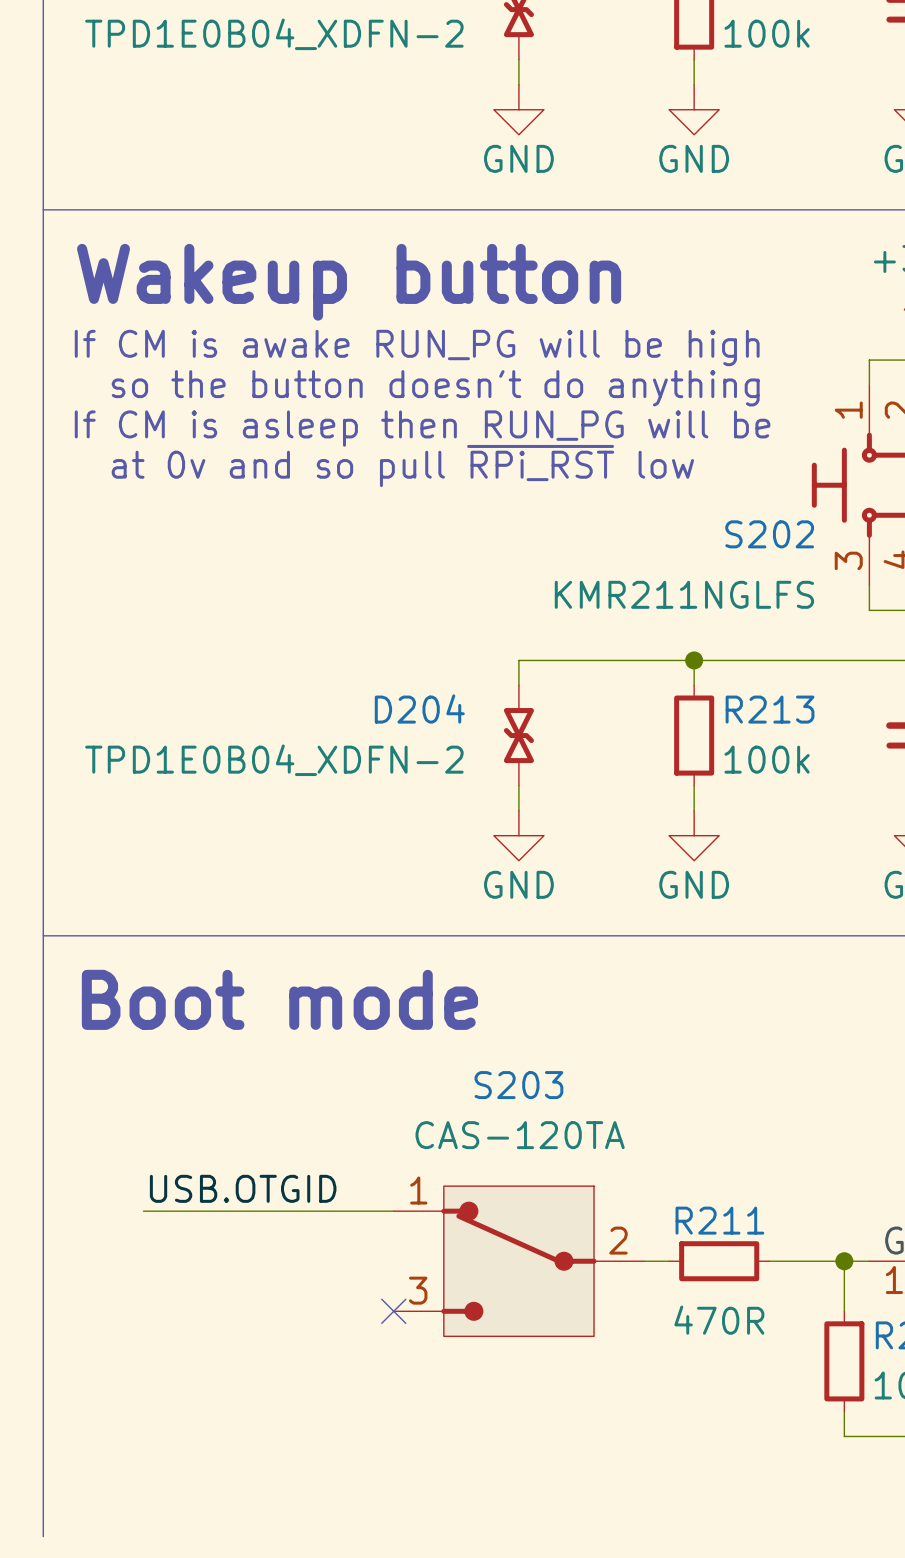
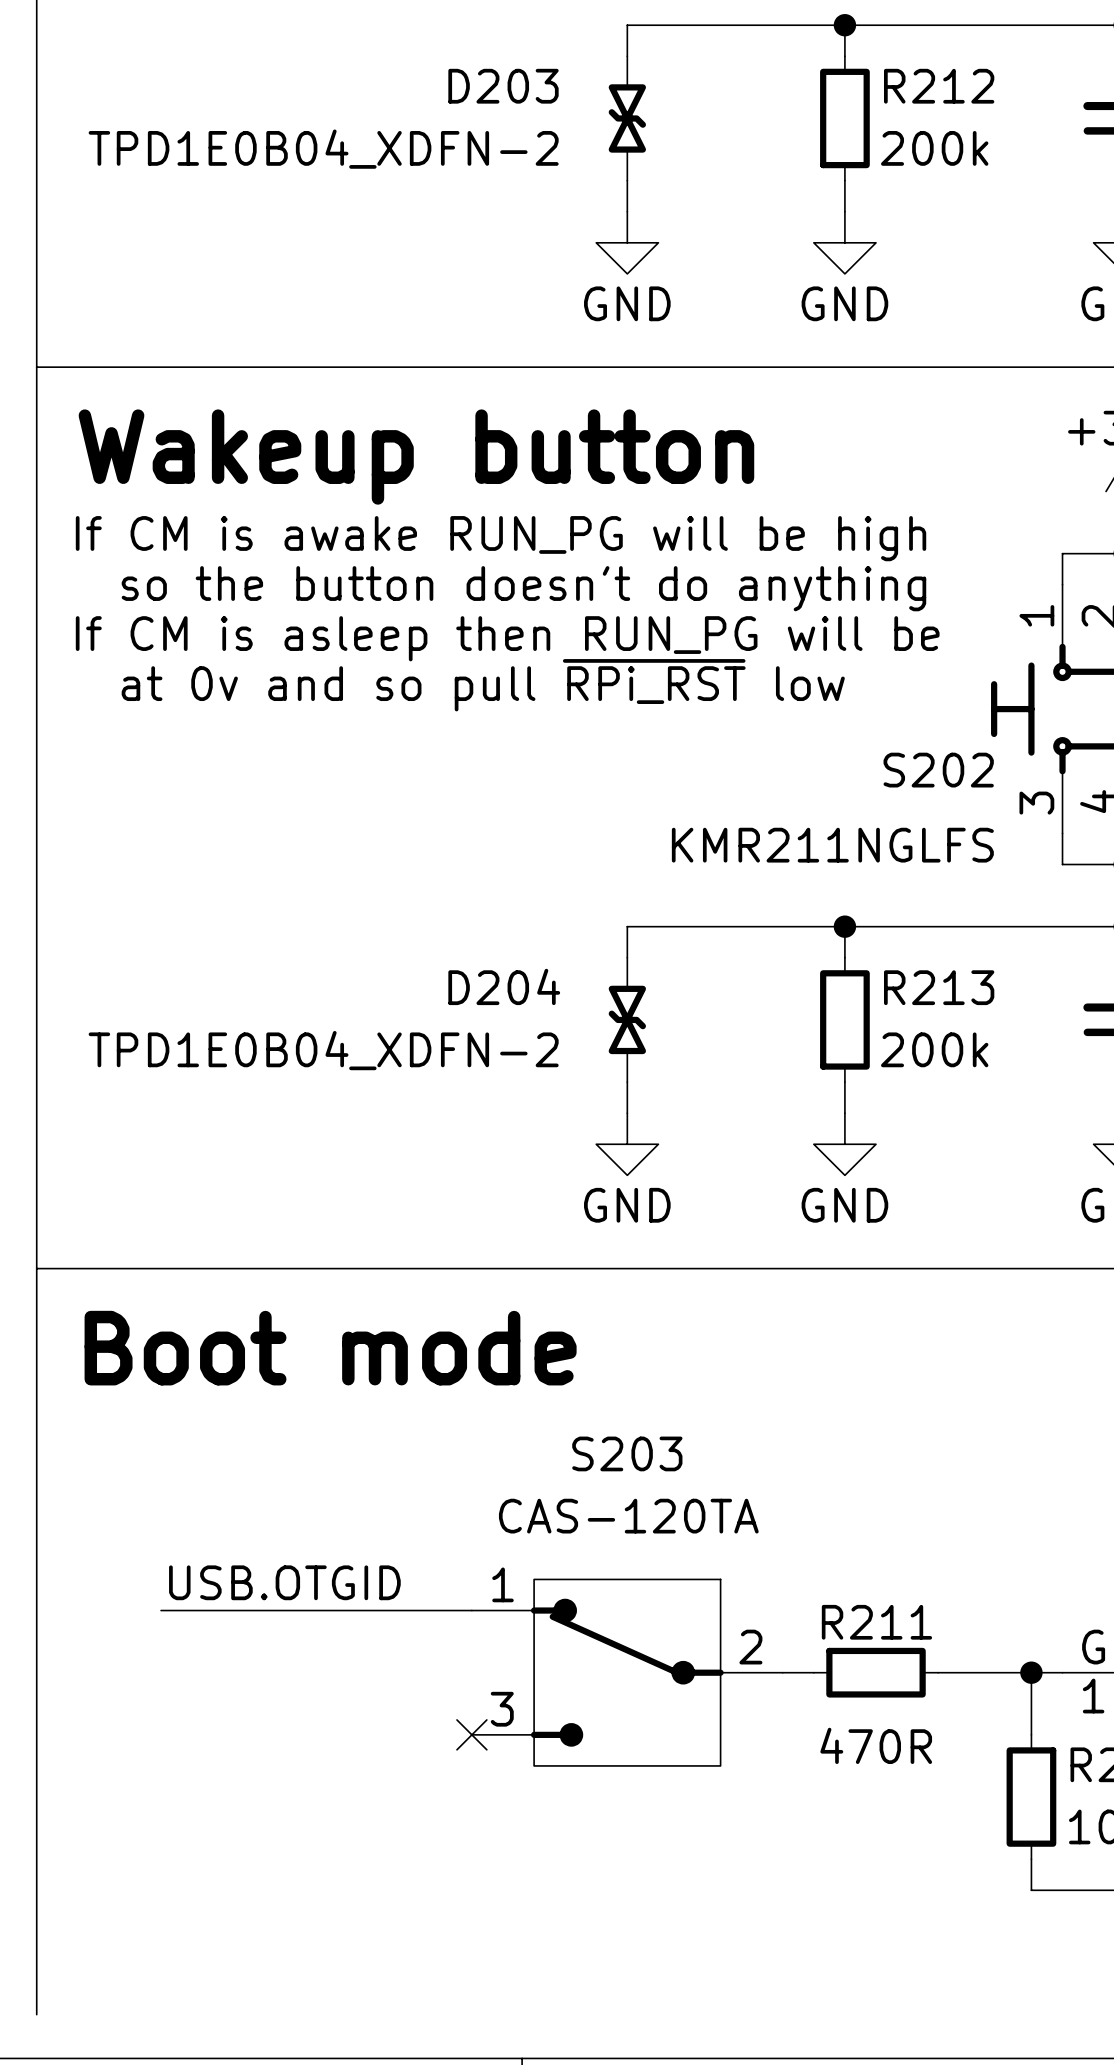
R212 text: 100k (767, 33) -> 200k (934, 148)
R213 text: 100k (767, 759) -> 200k (934, 1049)

